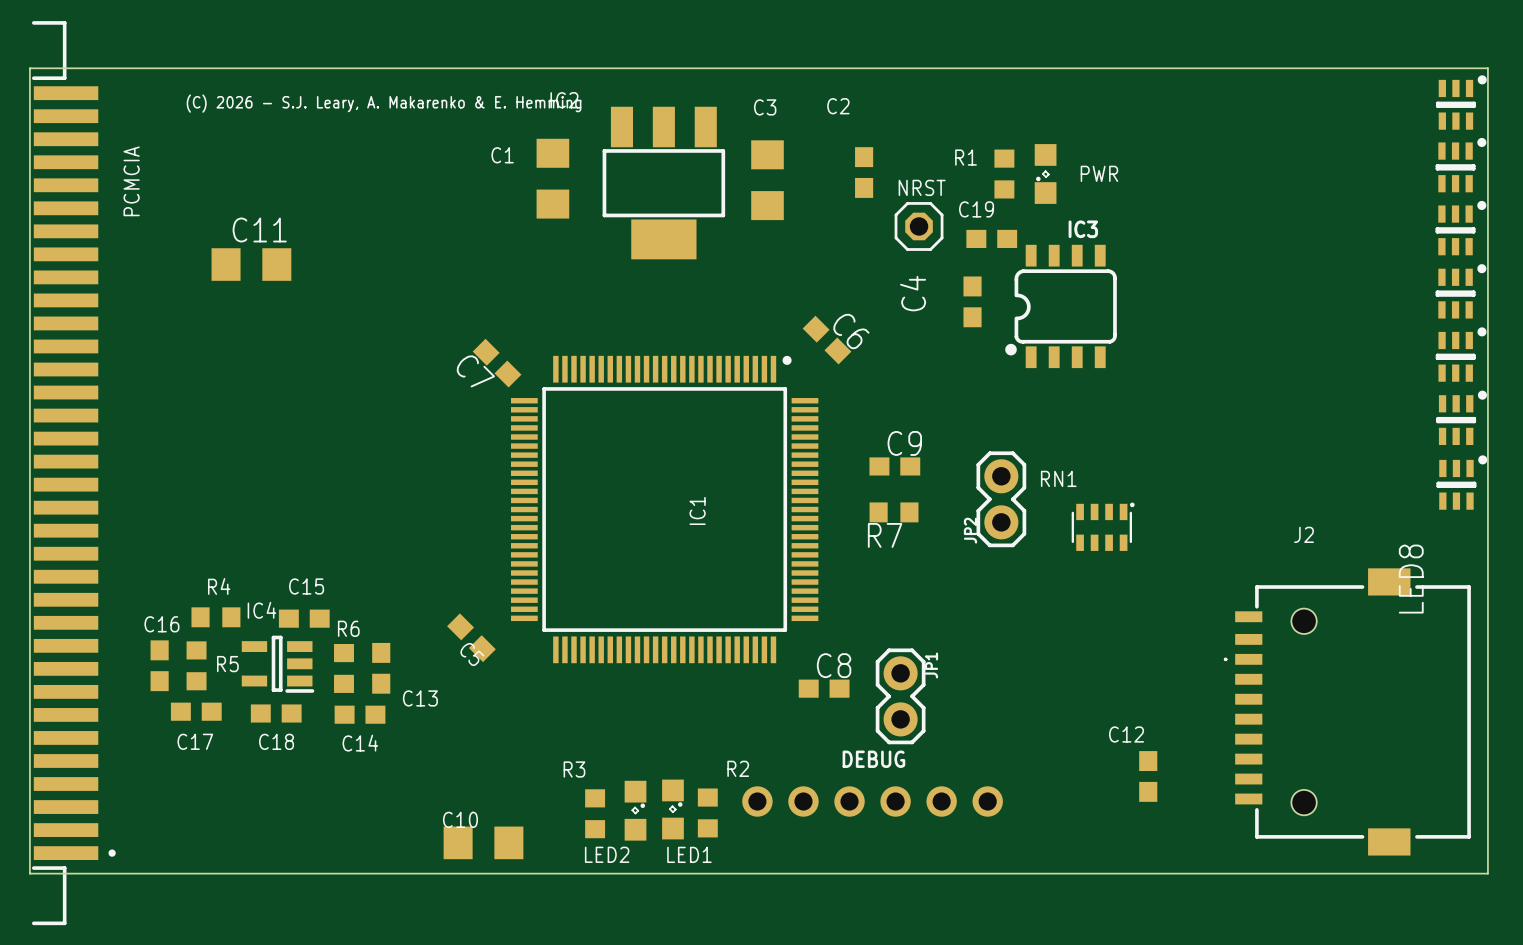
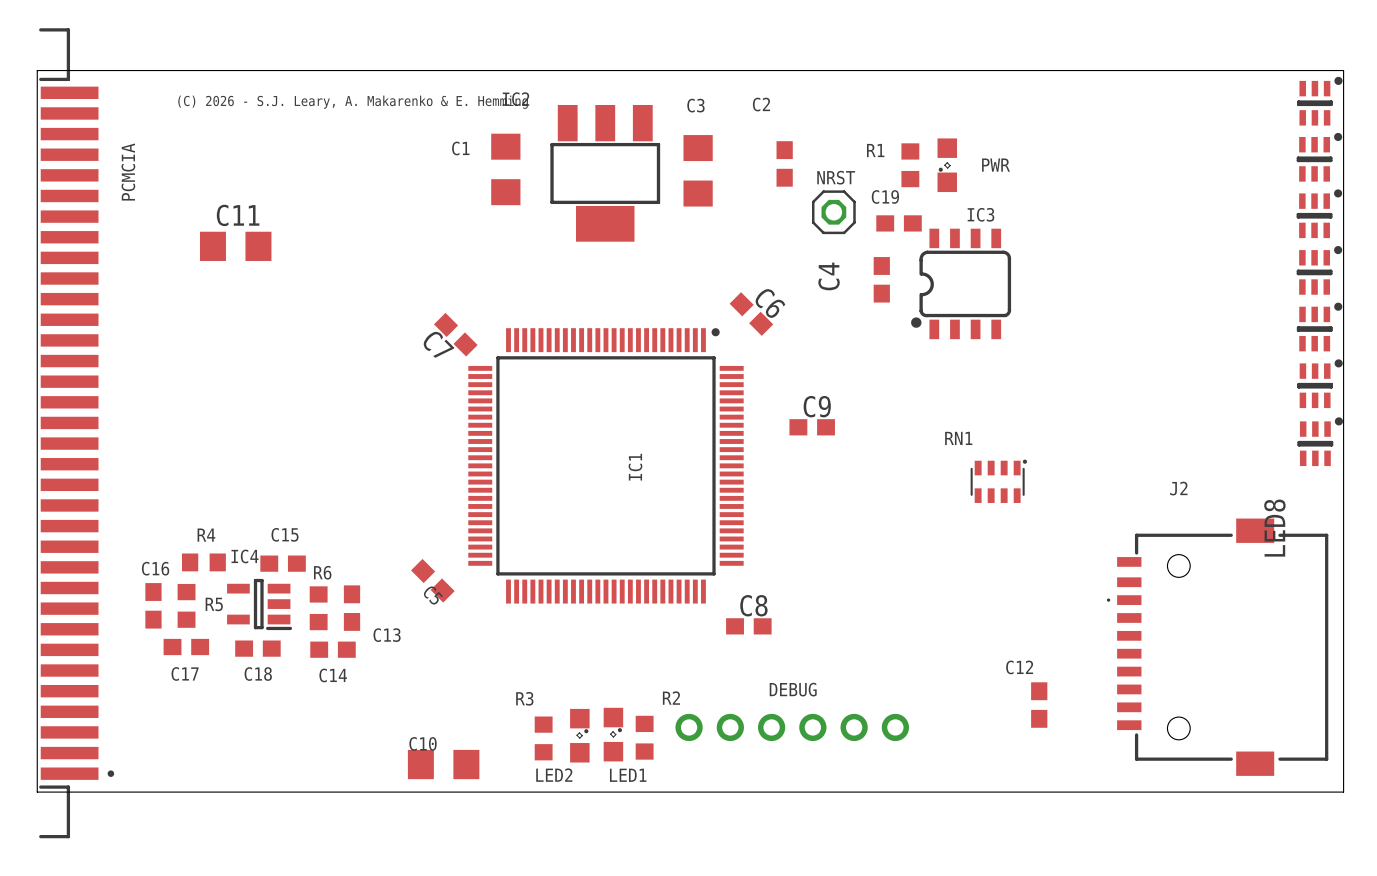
JP2: (1001, 499) -> none
R7: (894, 512) -> none
JP1: (900, 696) -> none

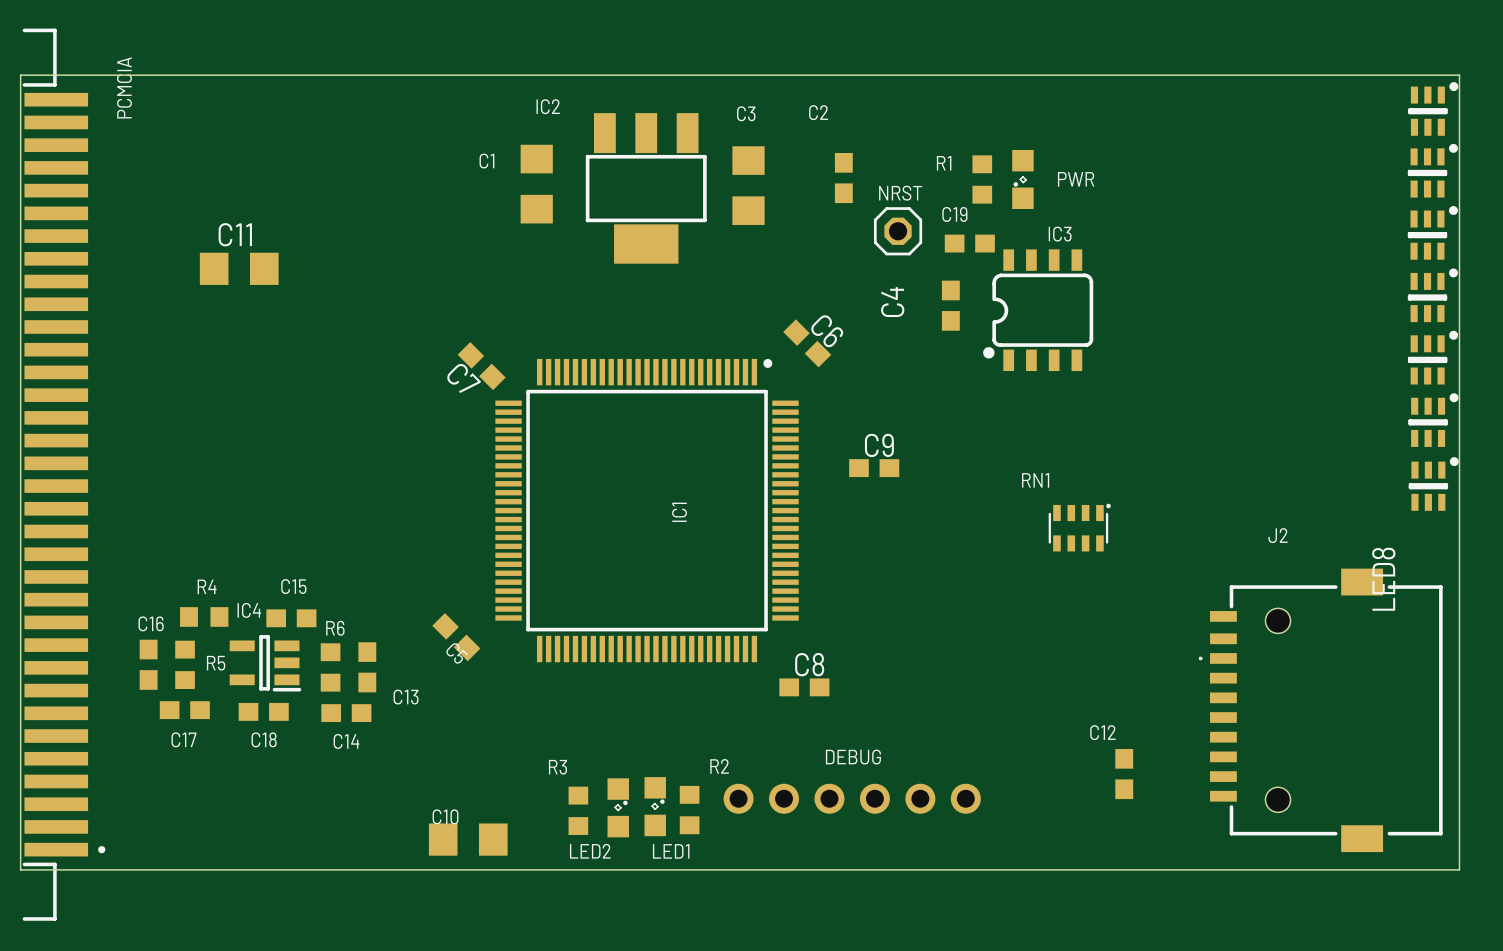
text: (C) 2026 - S.J. Leary, A. Makarenko & E. Hemming (353, 102) -> none
PCMCIA name position: PCMCIA (128, 172) -> PCMCIA (124, 87)

